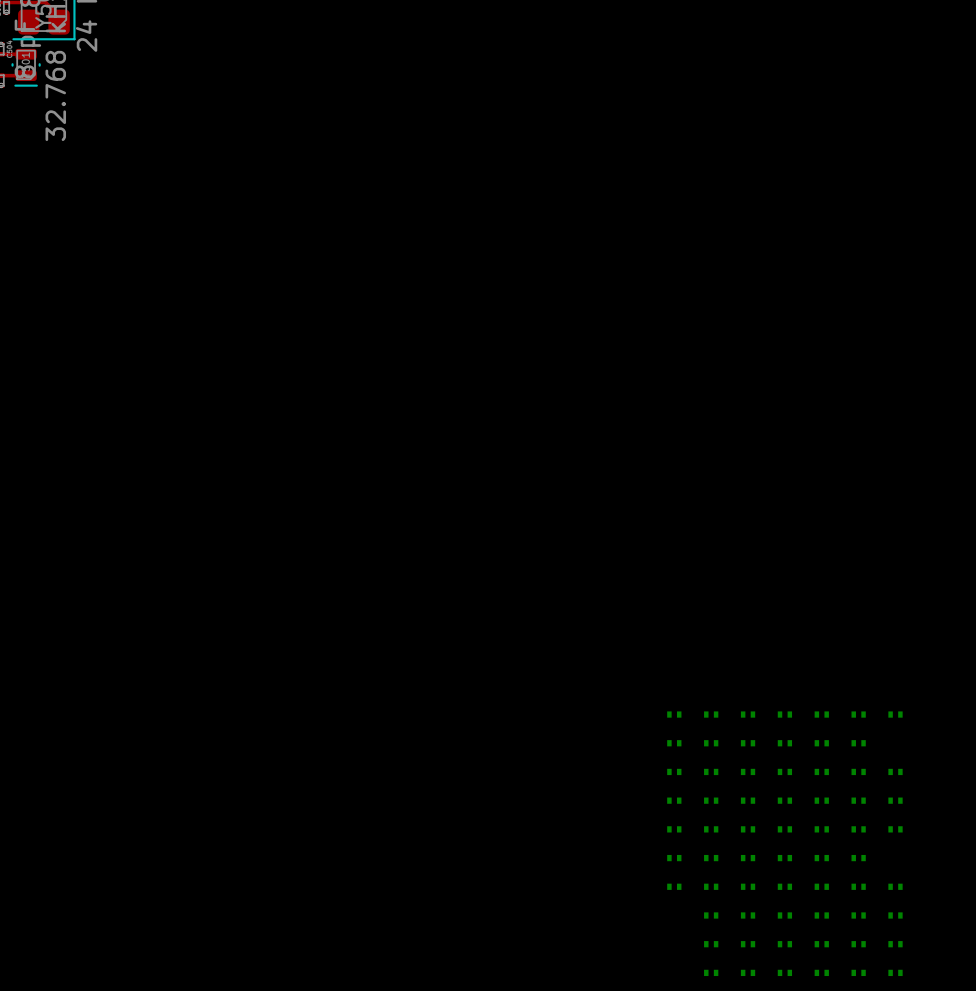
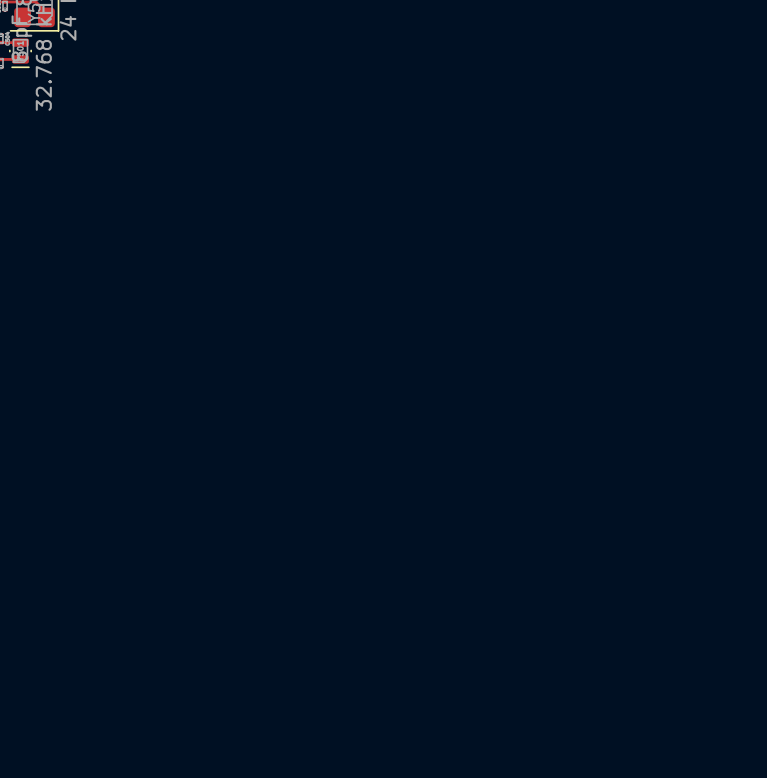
part: (674, 714) -> none
part: (711, 714) -> none
part: (748, 714) -> none
part: (784, 714) -> none
part: (821, 714) -> none
part: (858, 714) -> none
part: (895, 714) -> none
part: (674, 743) -> none
part: (711, 743) -> none
part: (748, 743) -> none
part: (784, 743) -> none
part: (821, 743) -> none
part: (858, 743) -> none
part: (674, 771) -> none
part: (711, 771) -> none
part: (748, 771) -> none
part: (784, 771) -> none
part: (821, 771) -> none
part: (858, 771) -> none
part: (895, 771) -> none
part: (674, 800) -> none
part: (711, 800) -> none
part: (748, 800) -> none
part: (784, 800) -> none
part: (821, 800) -> none
part: (858, 800) -> none
part: (895, 800) -> none
part: (674, 829) -> none
part: (711, 829) -> none
part: (748, 829) -> none
part: (784, 829) -> none
part: (821, 829) -> none
part: (858, 829) -> none
part: (895, 829) -> none
part: (674, 858) -> none
part: (711, 858) -> none
part: (748, 858) -> none
part: (784, 858) -> none
part: (821, 858) -> none
part: (858, 858) -> none
part: (674, 886) -> none
part: (711, 886) -> none
part: (748, 886) -> none
part: (784, 886) -> none
part: (821, 886) -> none
part: (858, 886) -> none
part: (895, 886) -> none
part: (711, 915) -> none
part: (748, 915) -> none
part: (784, 915) -> none
part: (821, 915) -> none
part: (858, 915) -> none
part: (895, 915) -> none
part: (711, 944) -> none
part: (748, 944) -> none
part: (784, 944) -> none
part: (821, 944) -> none
part: (858, 944) -> none
part: (895, 944) -> none
part: (711, 972) -> none
part: (748, 972) -> none
part: (784, 972) -> none
part: (821, 972) -> none
part: (858, 972) -> none
part: (895, 972) -> none

